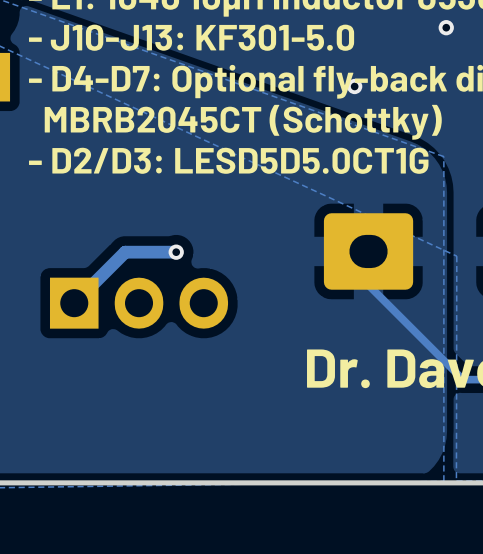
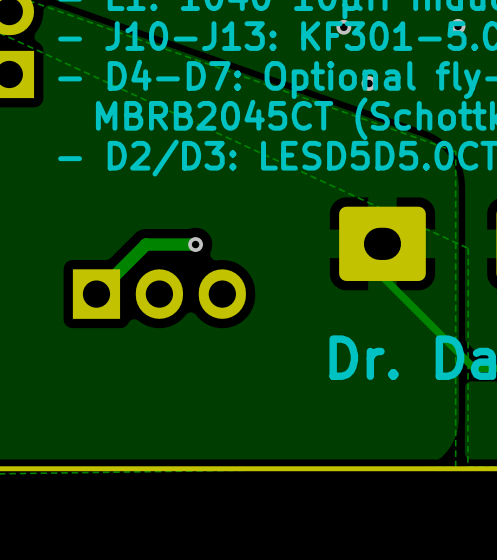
via: none -> (343, 27)

